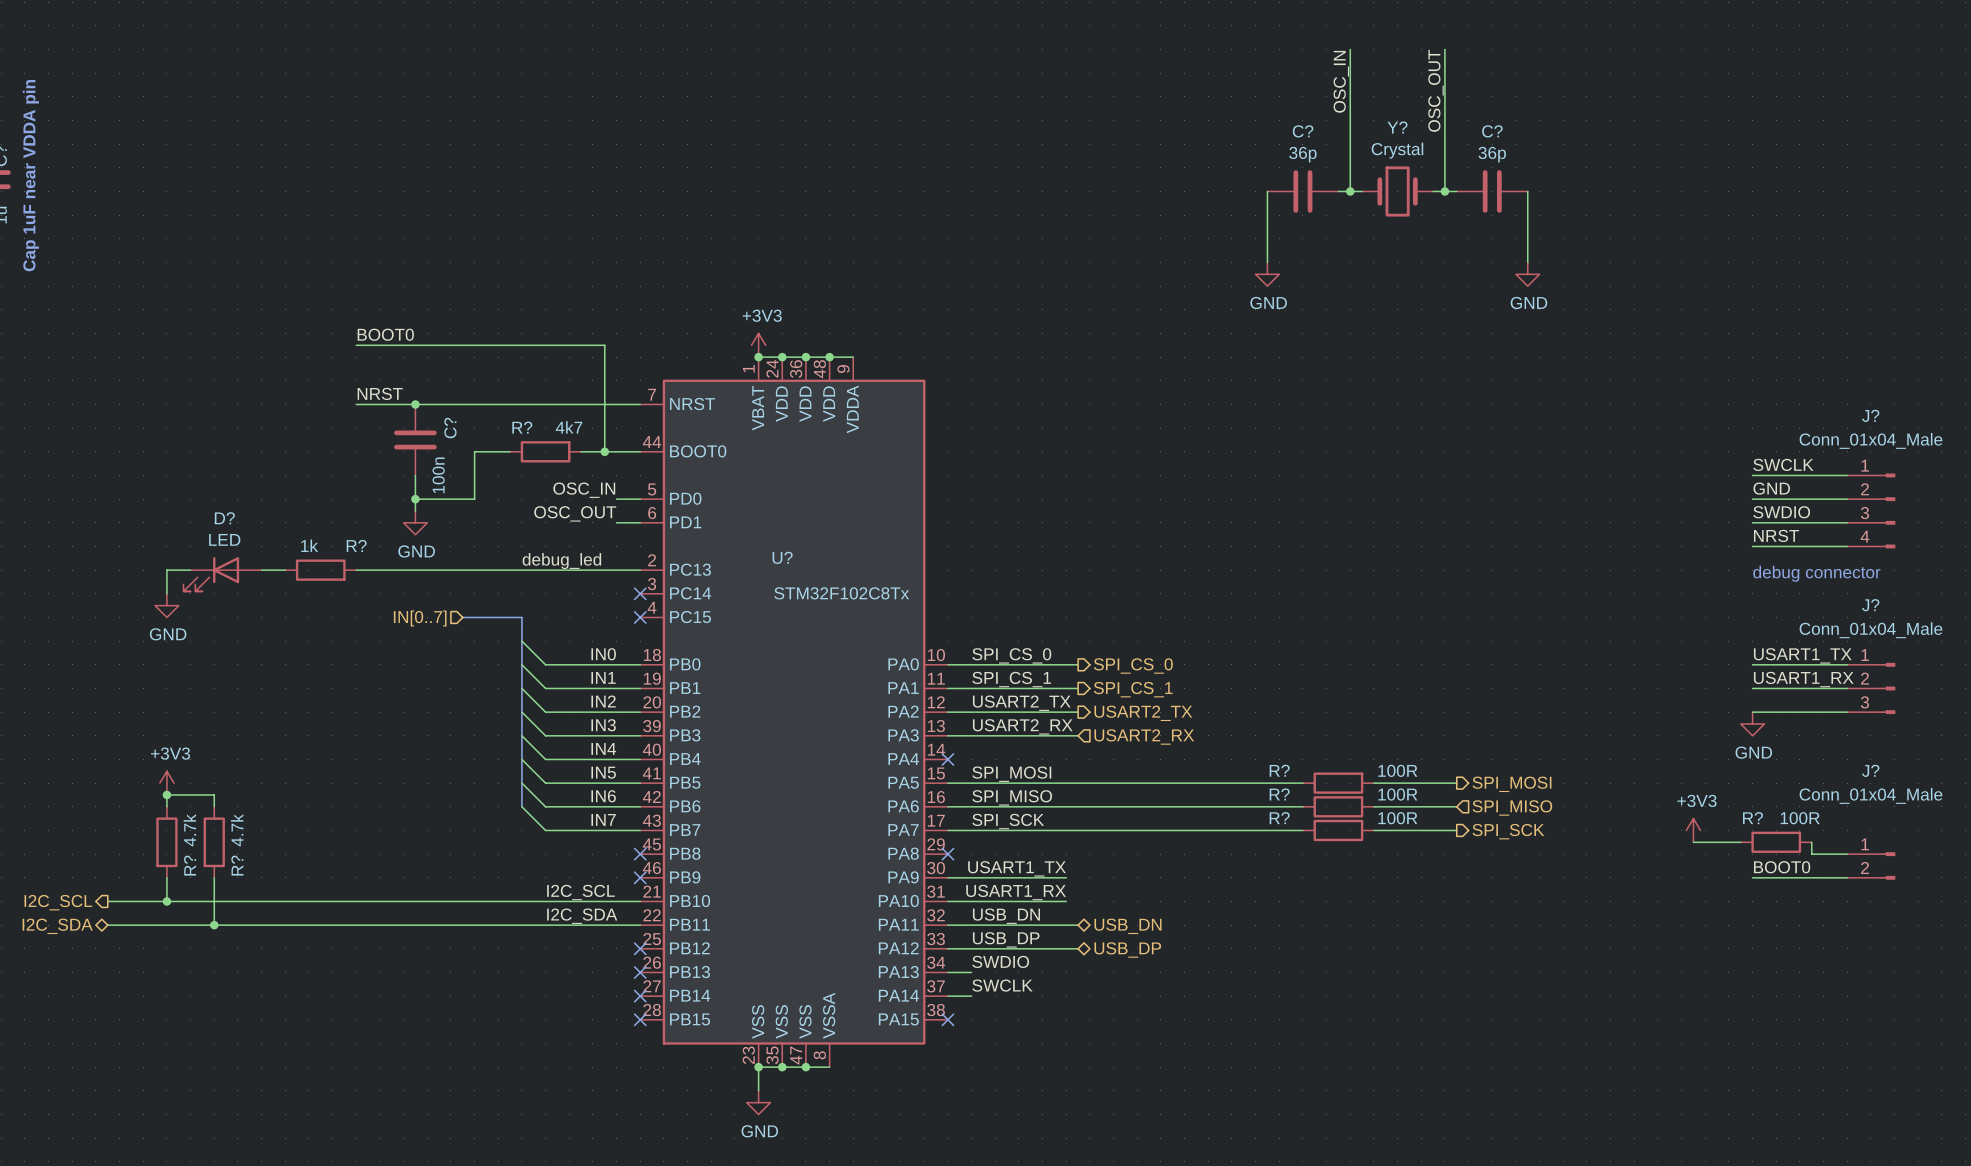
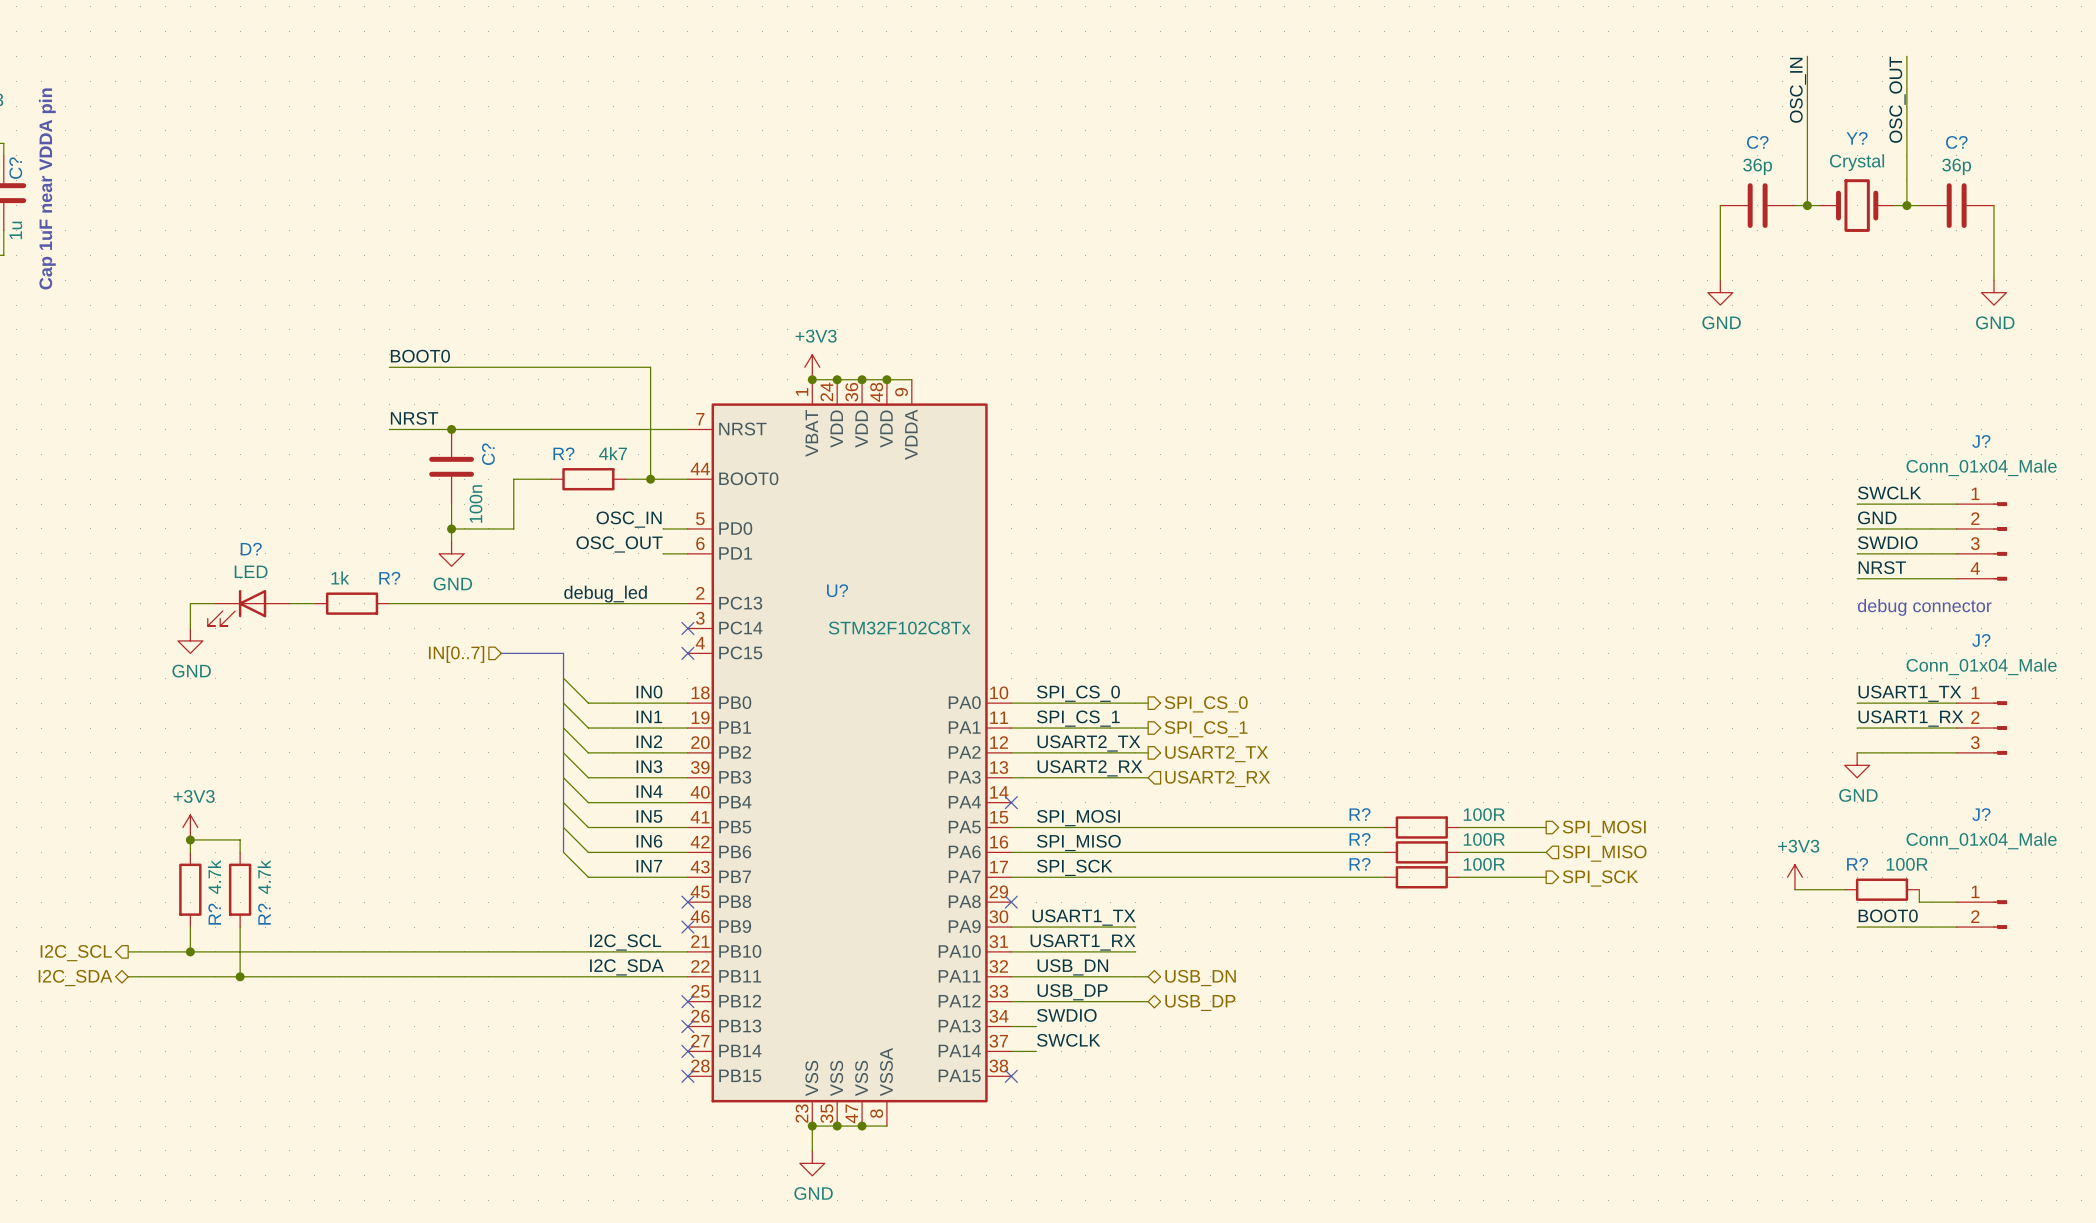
wire: (1350, 49) (1350, 191) -> none
wire: (1444, 49) (1444, 191) -> none
wire: none -> (1807, 56) (1807, 205)
wire: none -> (1906, 56) (1906, 205)
label: OSC_IN (1341, 81) -> none
label: none -> OSC_IN (1798, 90)
label: OSC_OUT (1435, 90) -> none
label: none -> OSC_OUT (1897, 99)
wire: (1267, 191) (1267, 262) -> none
C?: 36p (1302, 191) -> none
wire: (1338, 191) (1362, 191) -> none
junction: (1350, 191) -> none
Y?: Crystal (1397, 191) -> none
wire: (1433, 191) (1456, 191) -> none
junction: (1444, 191) -> none
C? position: (1492, 191) -> (1757, 205)
wire: (1527, 191) (1527, 262) -> (1720, 205) (1720, 280)
wire: none -> (1794, 205) (1819, 205)
junction: none -> (1807, 205)
Y?: none -> Crystal (1857, 205)
wire: none -> (1894, 205) (1919, 205)
junction: none -> (1906, 205)
C?: none -> 36p (1956, 205)
wire: none -> (1993, 205) (1993, 280)
power symbol: GND (1267, 274) -> none
power symbol position: GND (1527, 274) -> GND (1720, 292)
power symbol: none -> GND (1993, 292)

